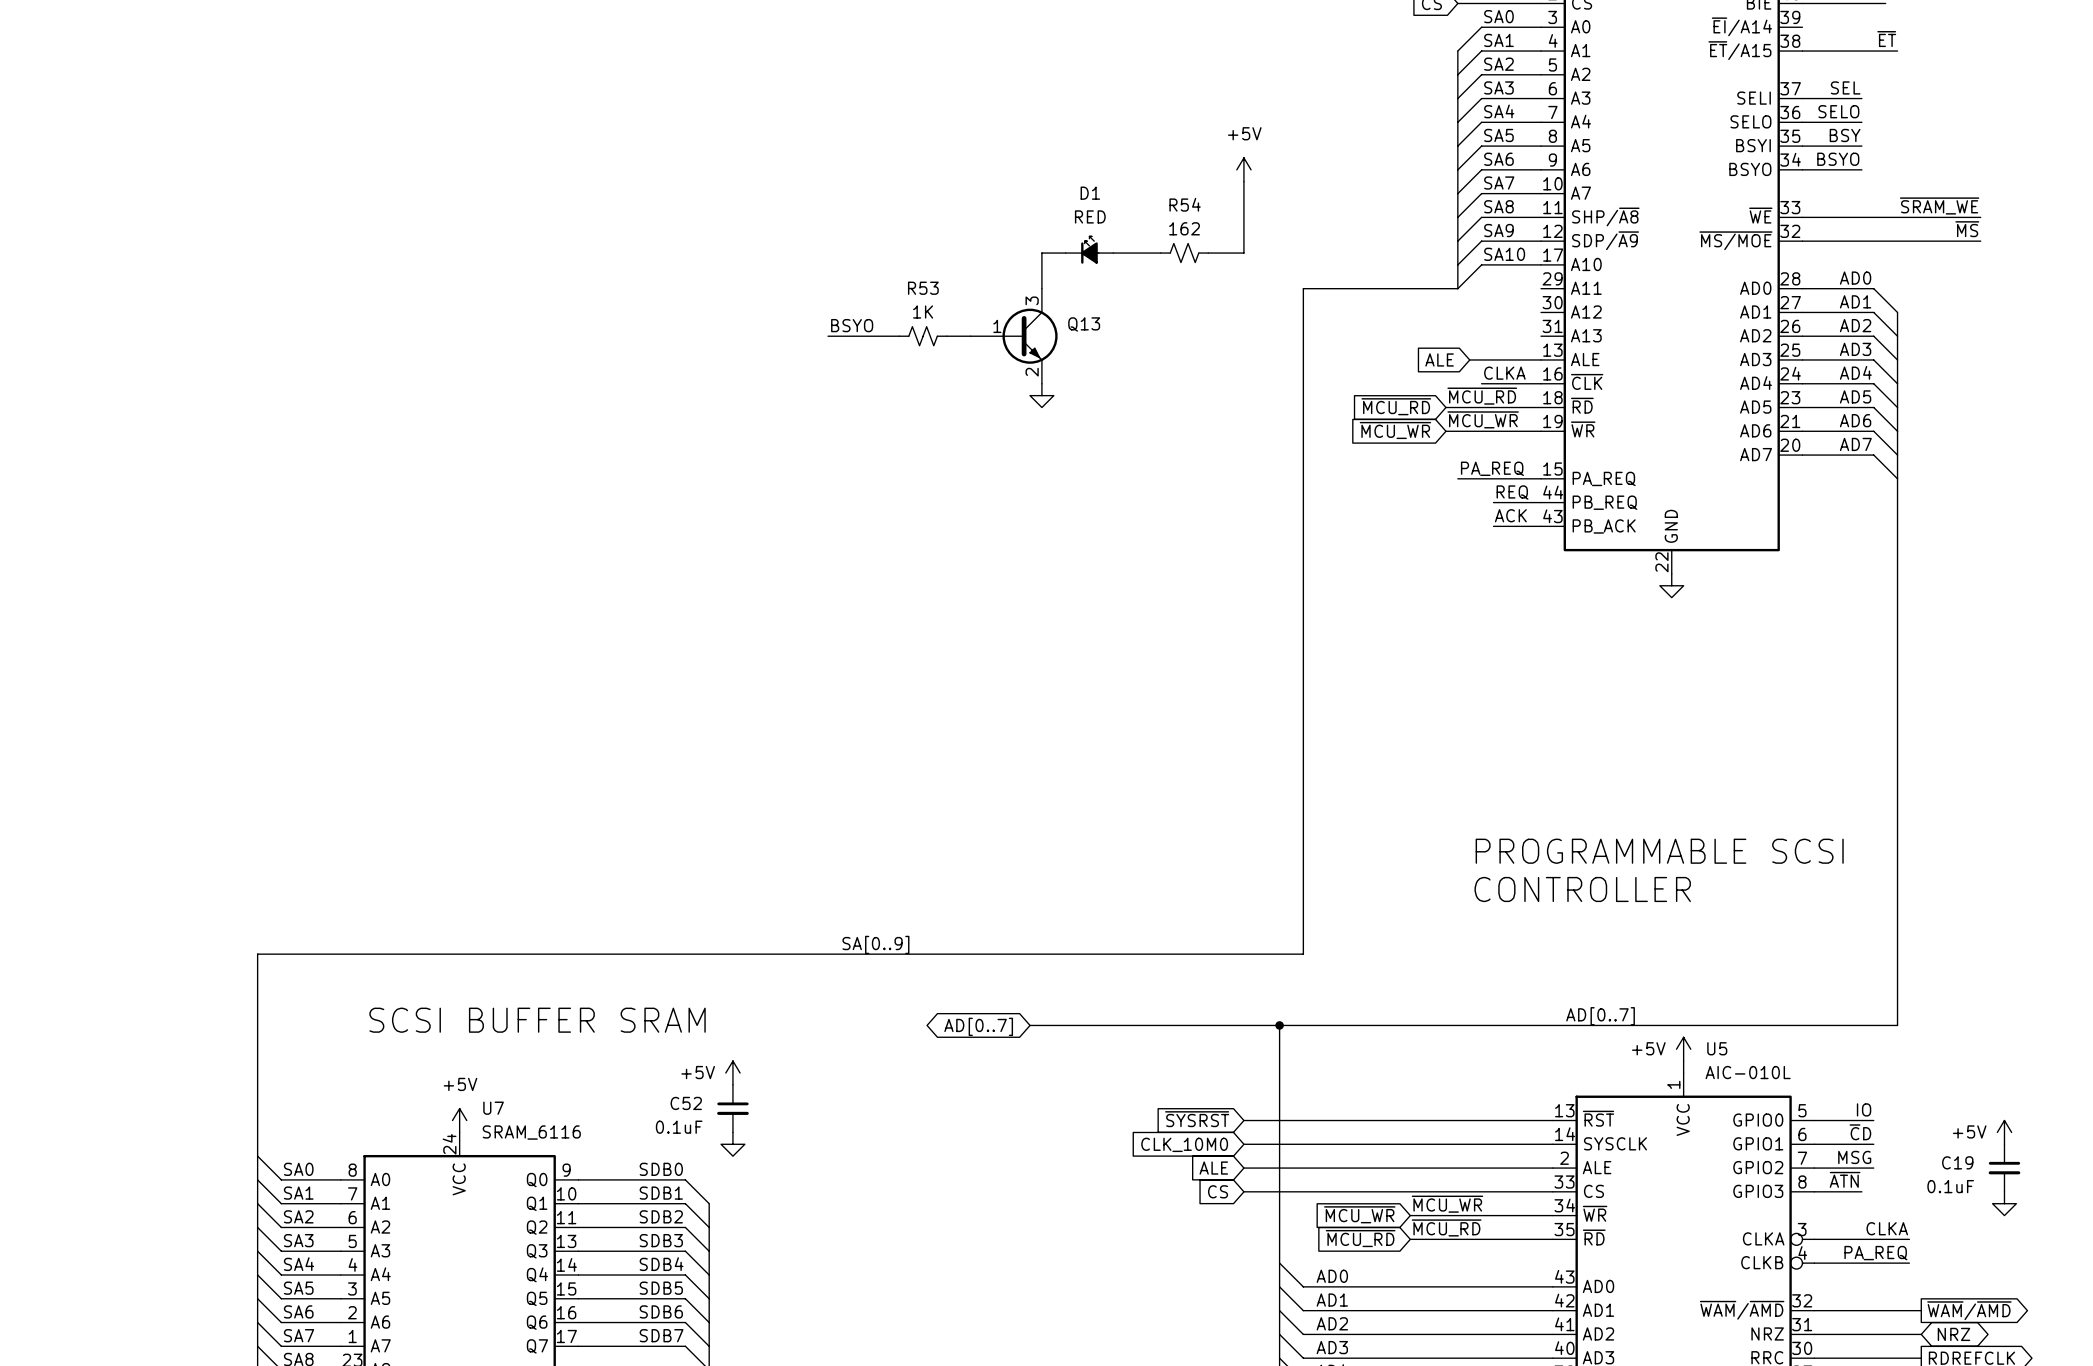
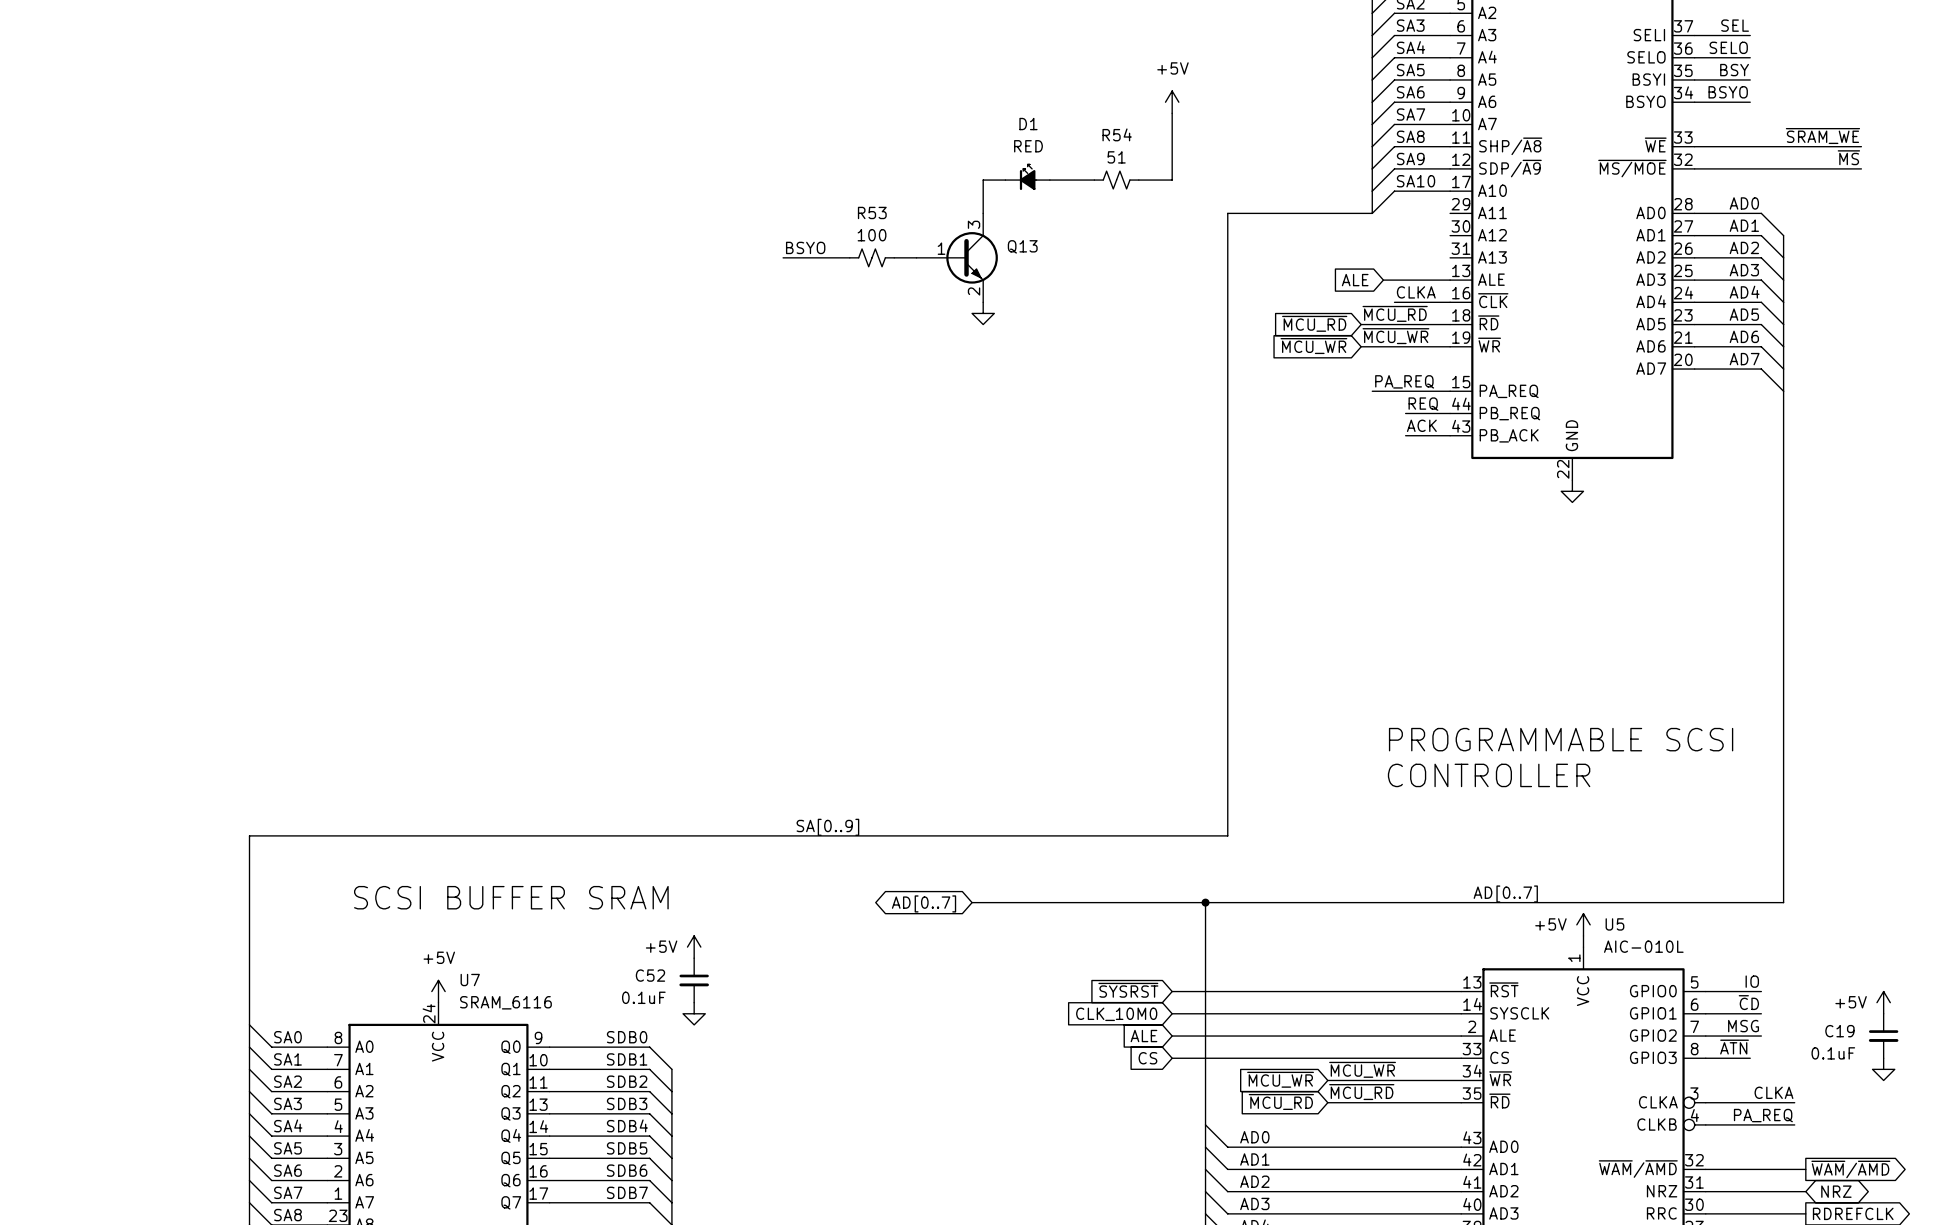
R54 value: 162 (1184, 228) -> 51 (1116, 157)
R53 value: 1K (923, 312) -> 100 (872, 235)

